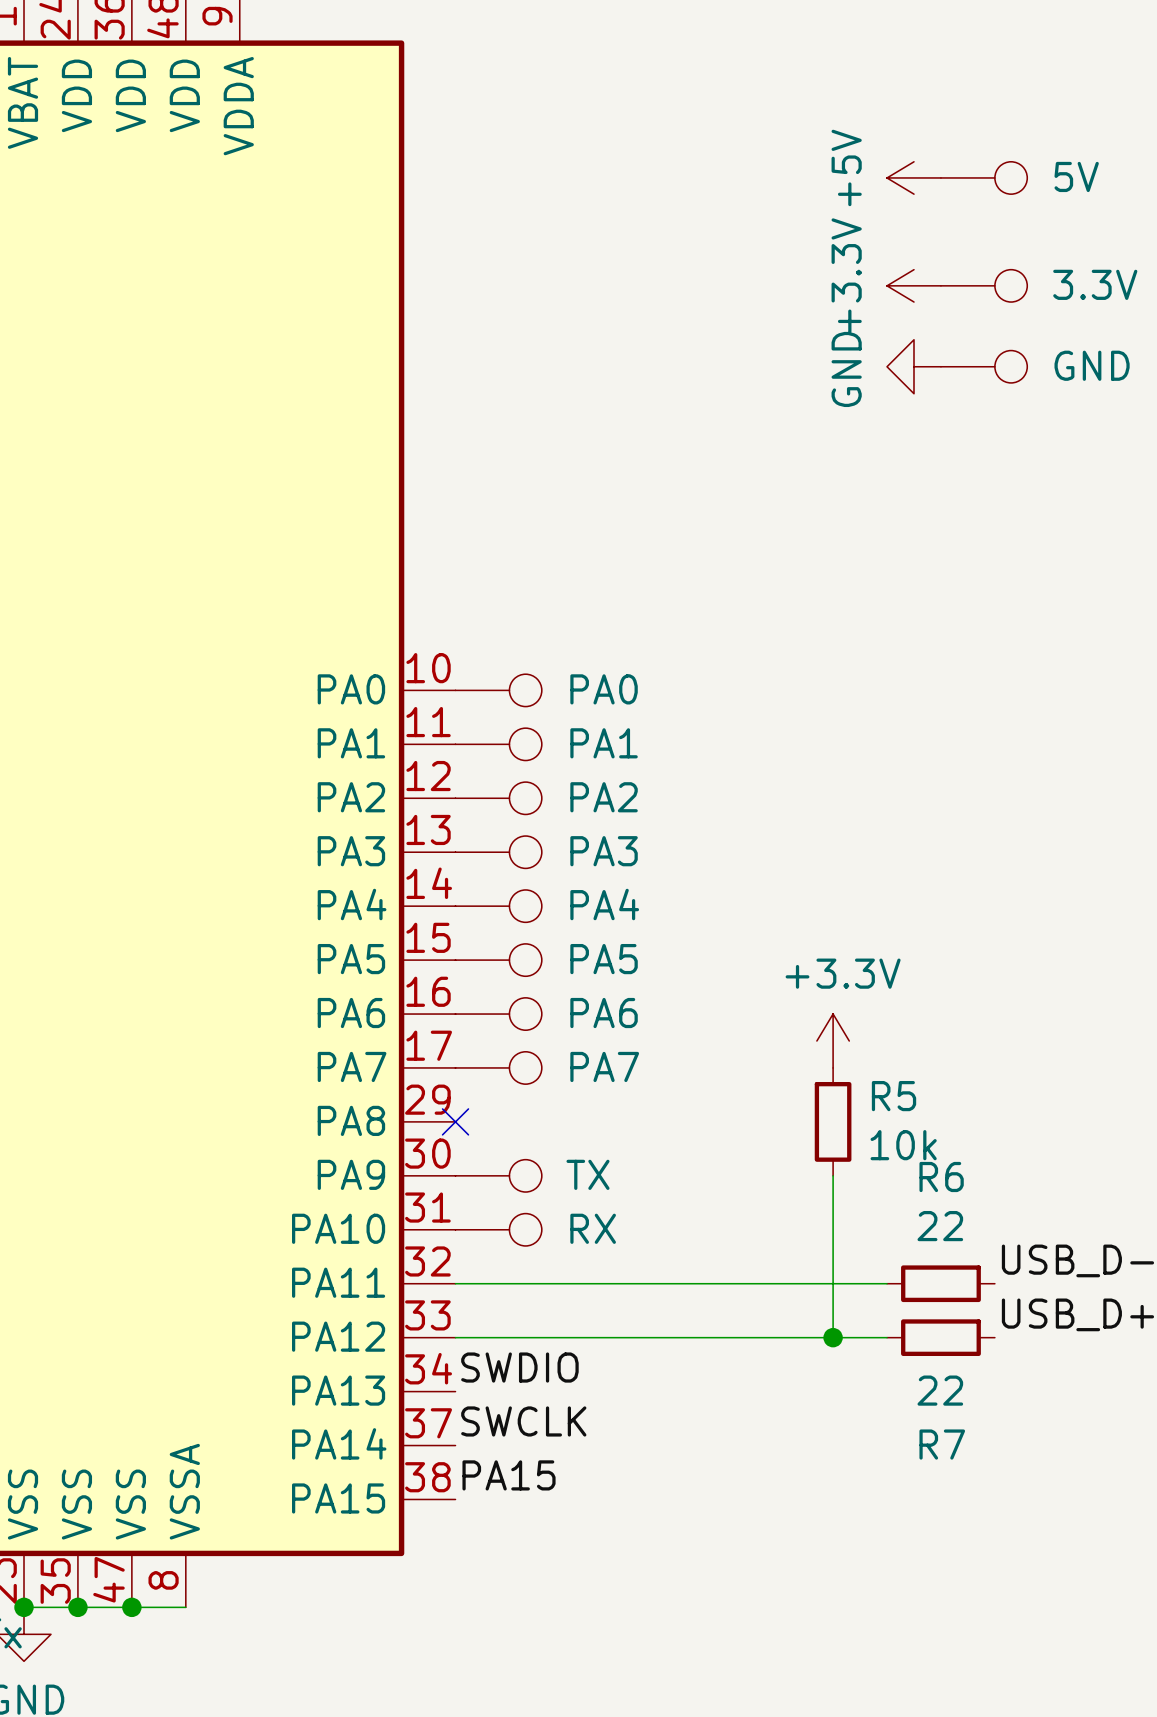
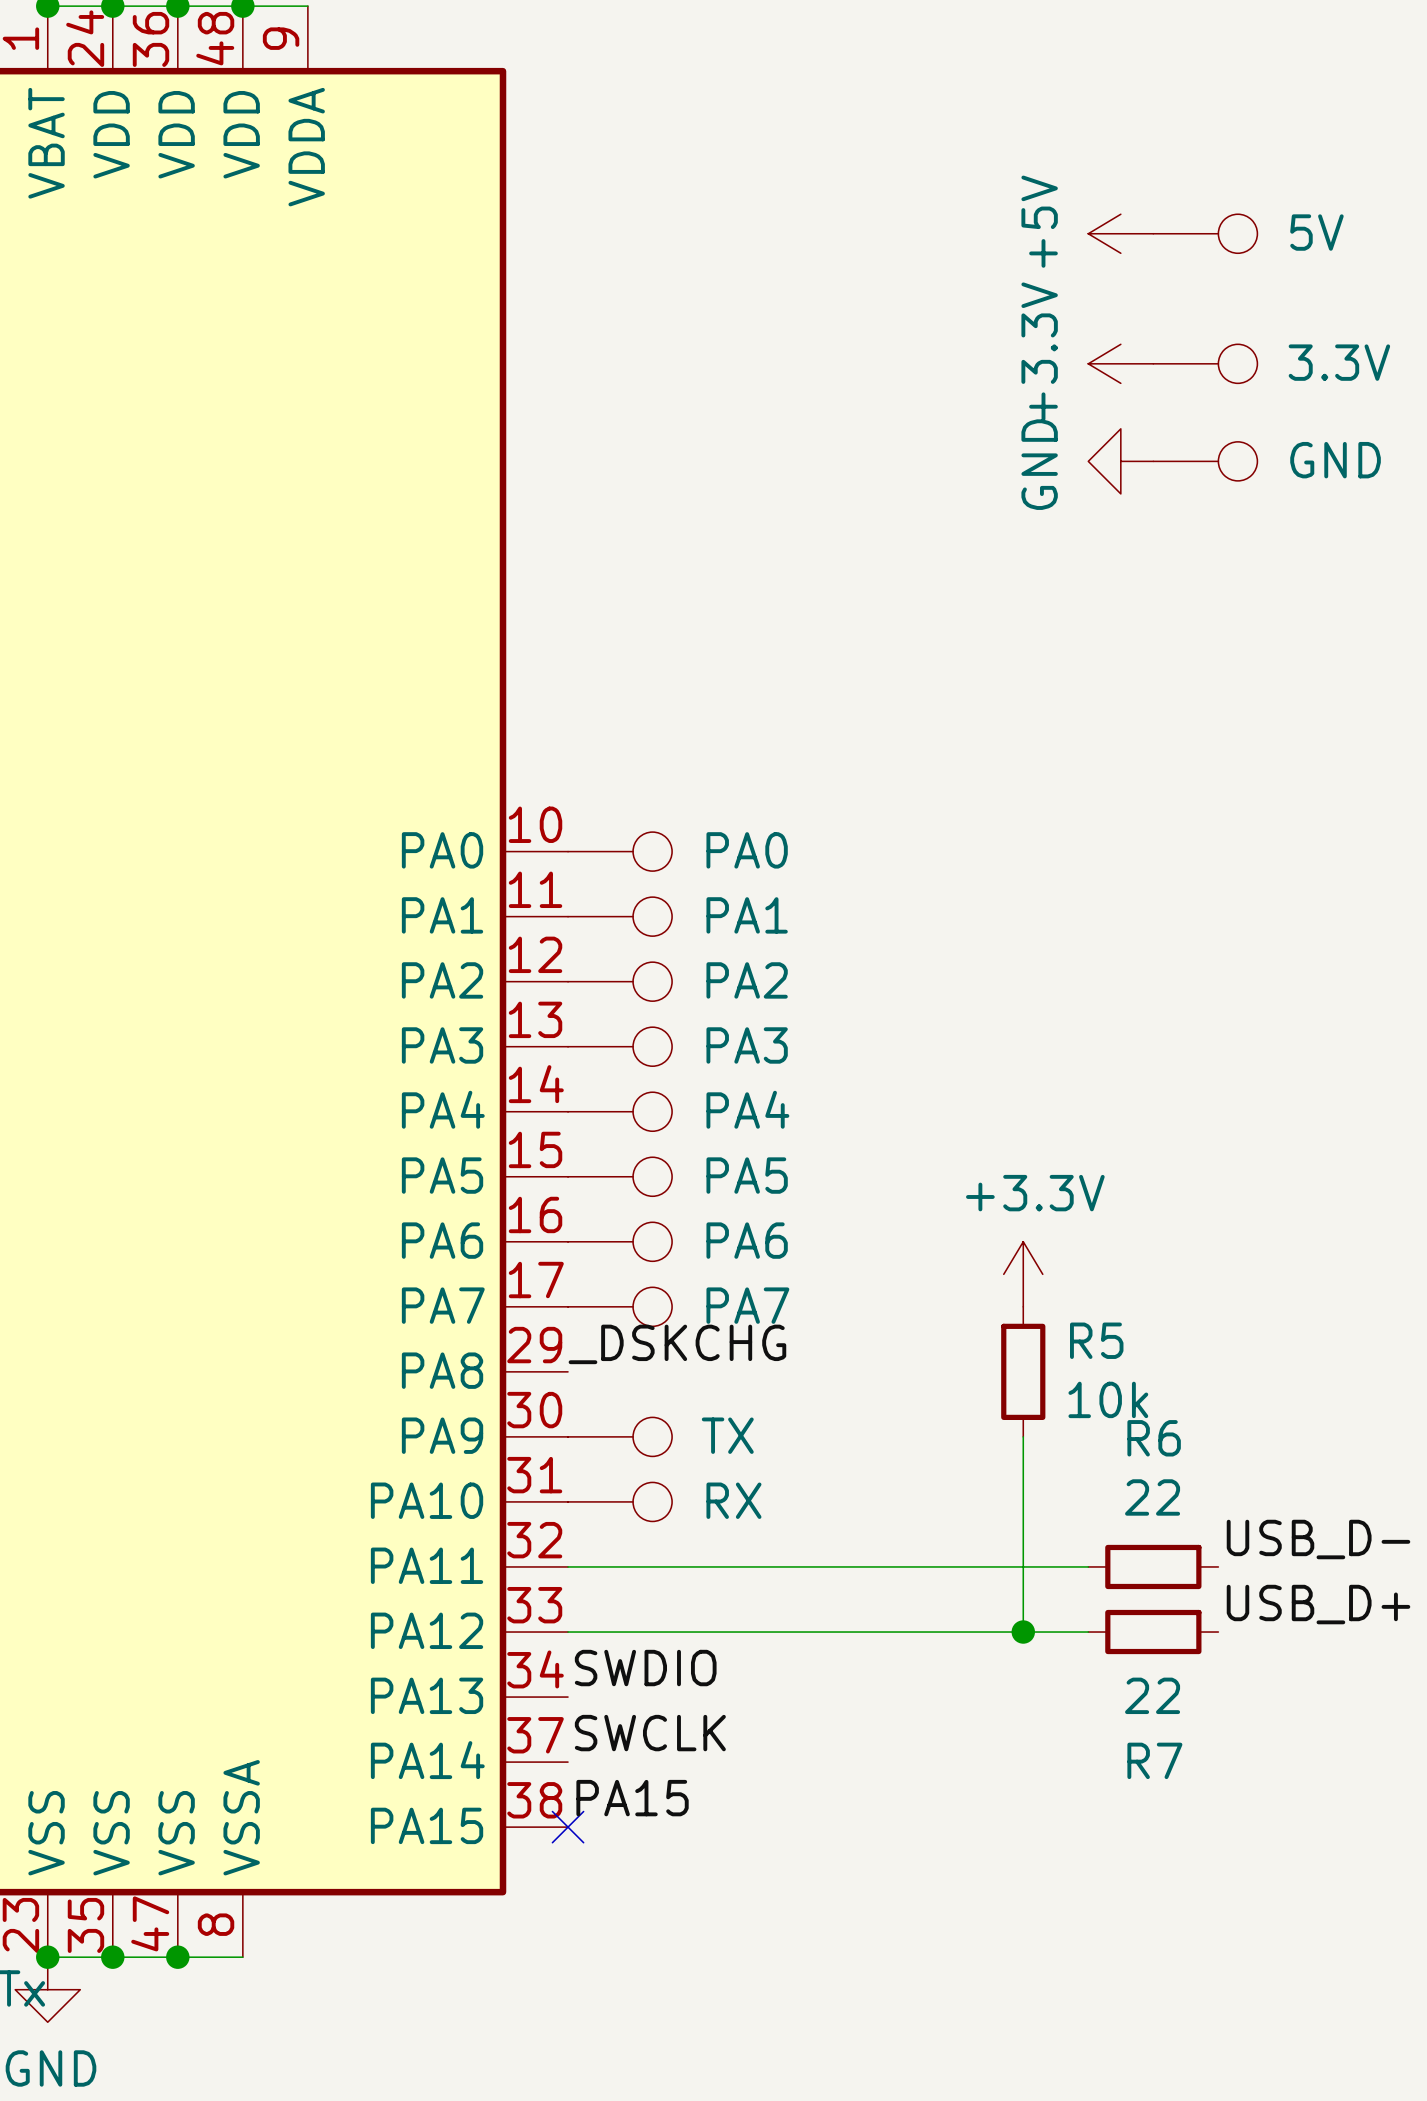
label: none -> _DSKCHG (677, 1344)
no-connect mark: (455, 1121) -> none
no-connect mark: none -> (568, 1827)

